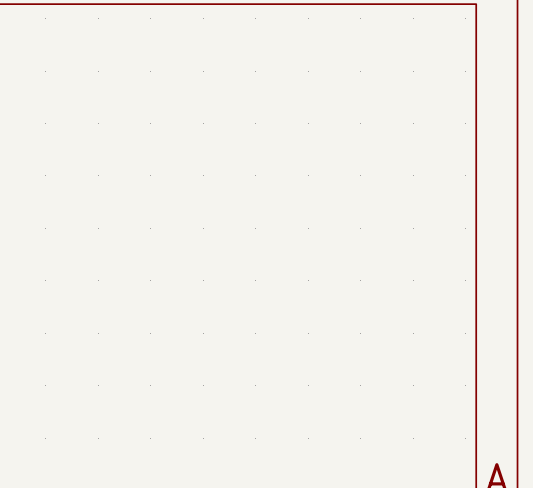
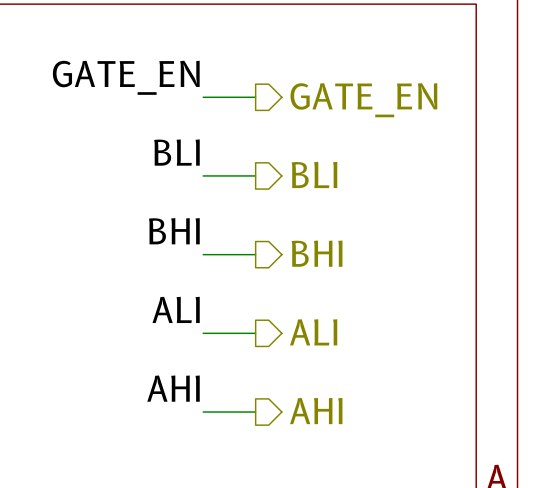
label: none -> GATE_EN (126, 77)
wire: none -> (203, 97) (255, 97)
hierarchical label: none -> GATE_EN (363, 100)
label: none -> BLI (176, 152)
hierarchical label: none -> BLI (314, 174)
wire: none -> (203, 175) (255, 175)
label: none -> BHI (174, 231)
hierarchical label: none -> BHI (317, 253)
wire: none -> (203, 254) (255, 254)
label: none -> ALI (176, 309)
hierarchical label: none -> ALI (313, 332)
wire: none -> (203, 333) (255, 333)
label: none -> AHI (173, 388)
hierarchical label: none -> AHI (316, 411)
wire: none -> (203, 412) (255, 412)

